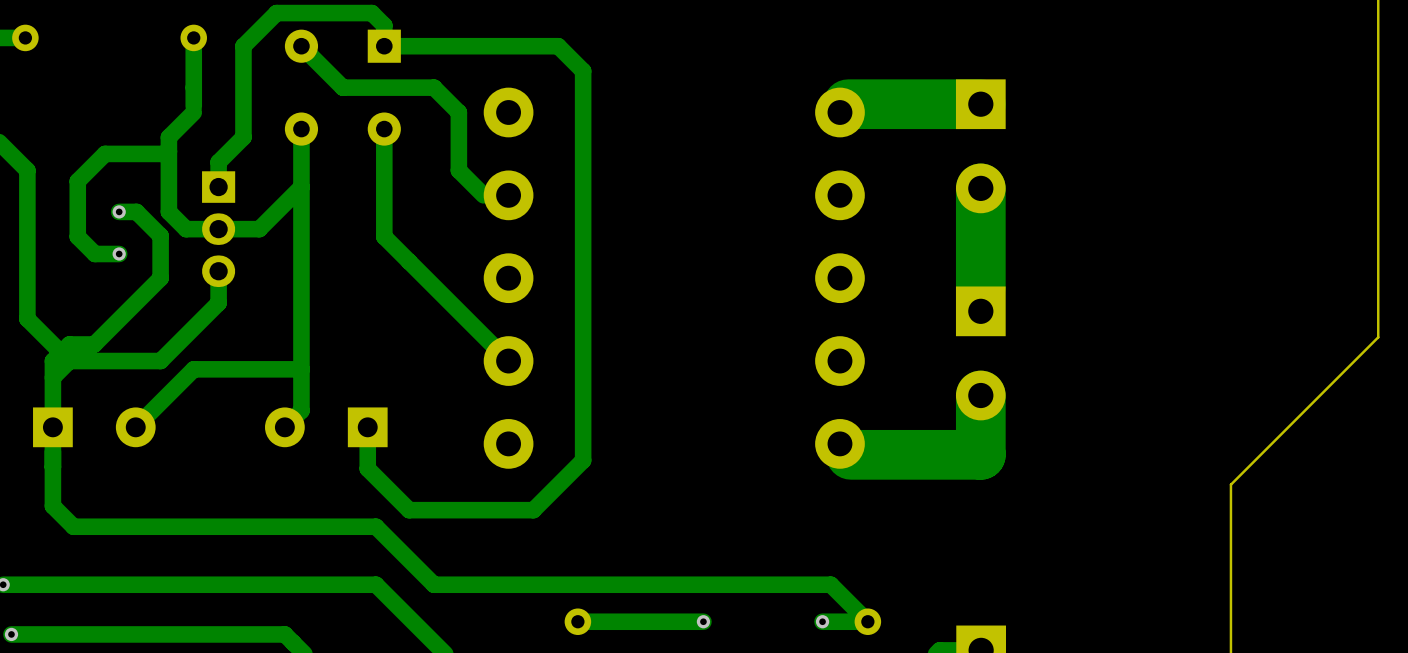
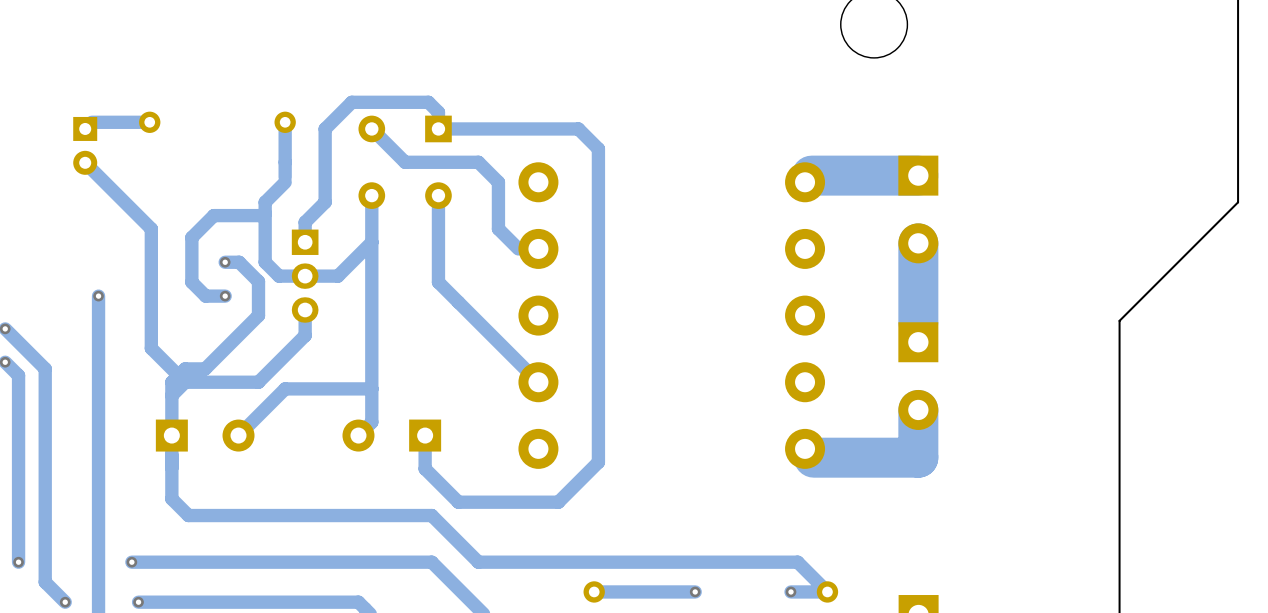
board edge: (1378, 137) (1378, 337) (1230, 484) -> (1238, 202) (1119, 320) (1119, 481)

